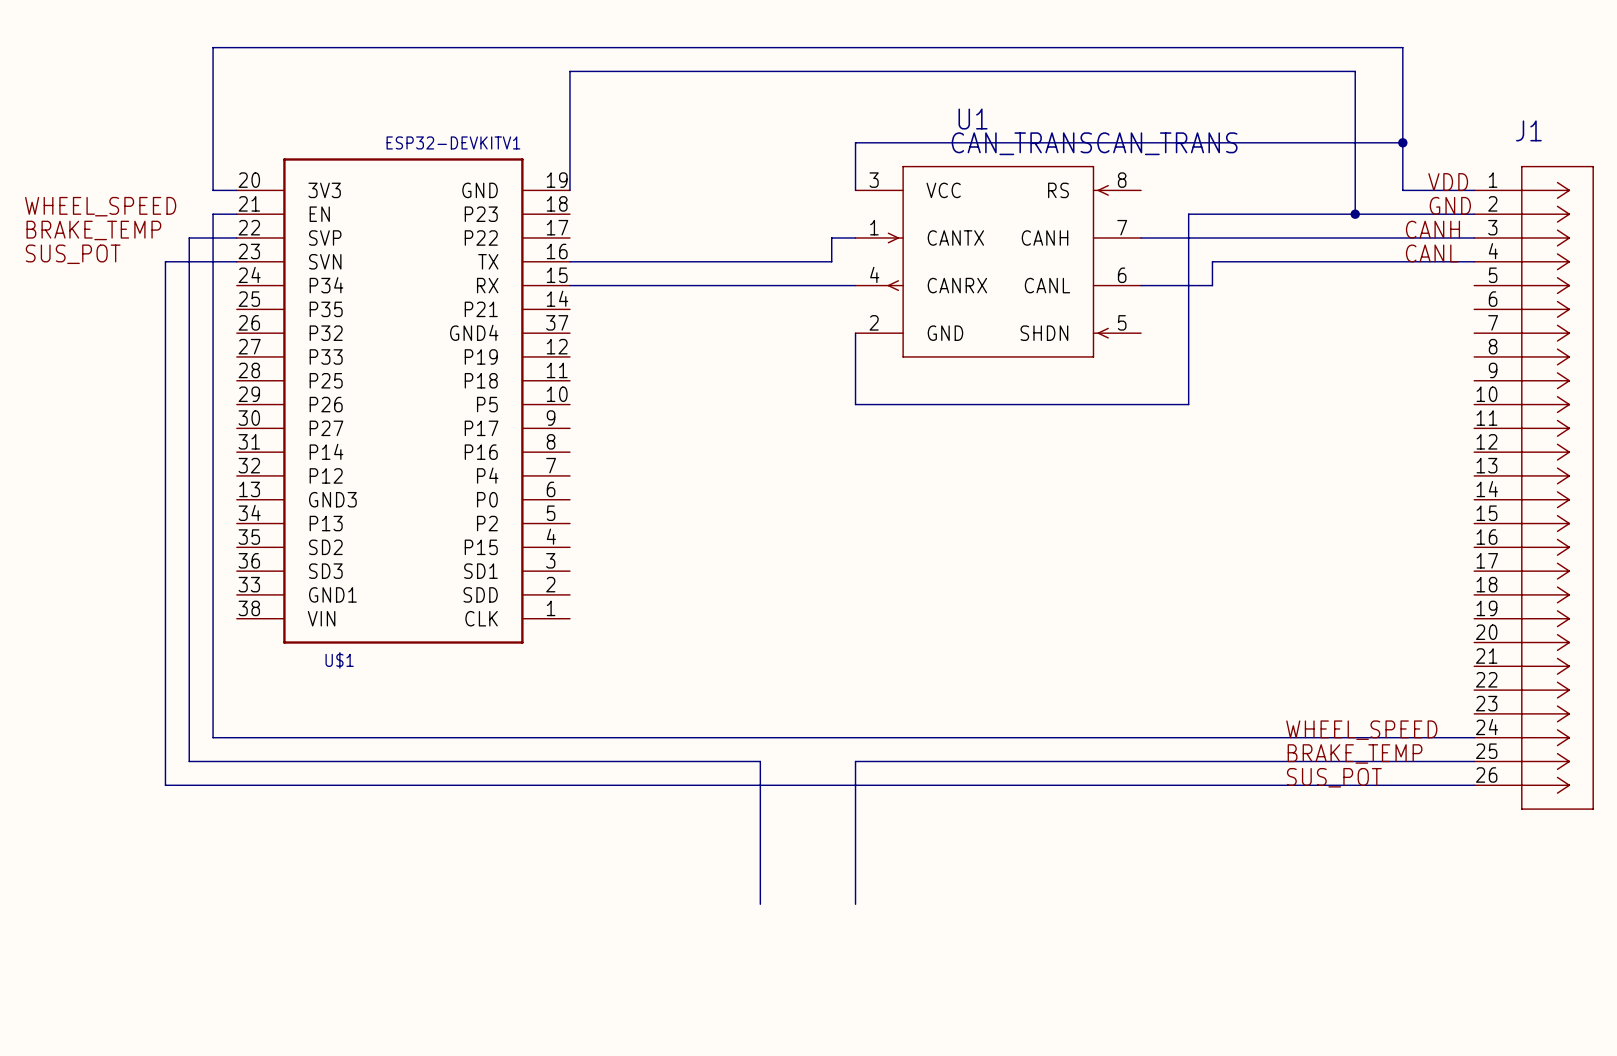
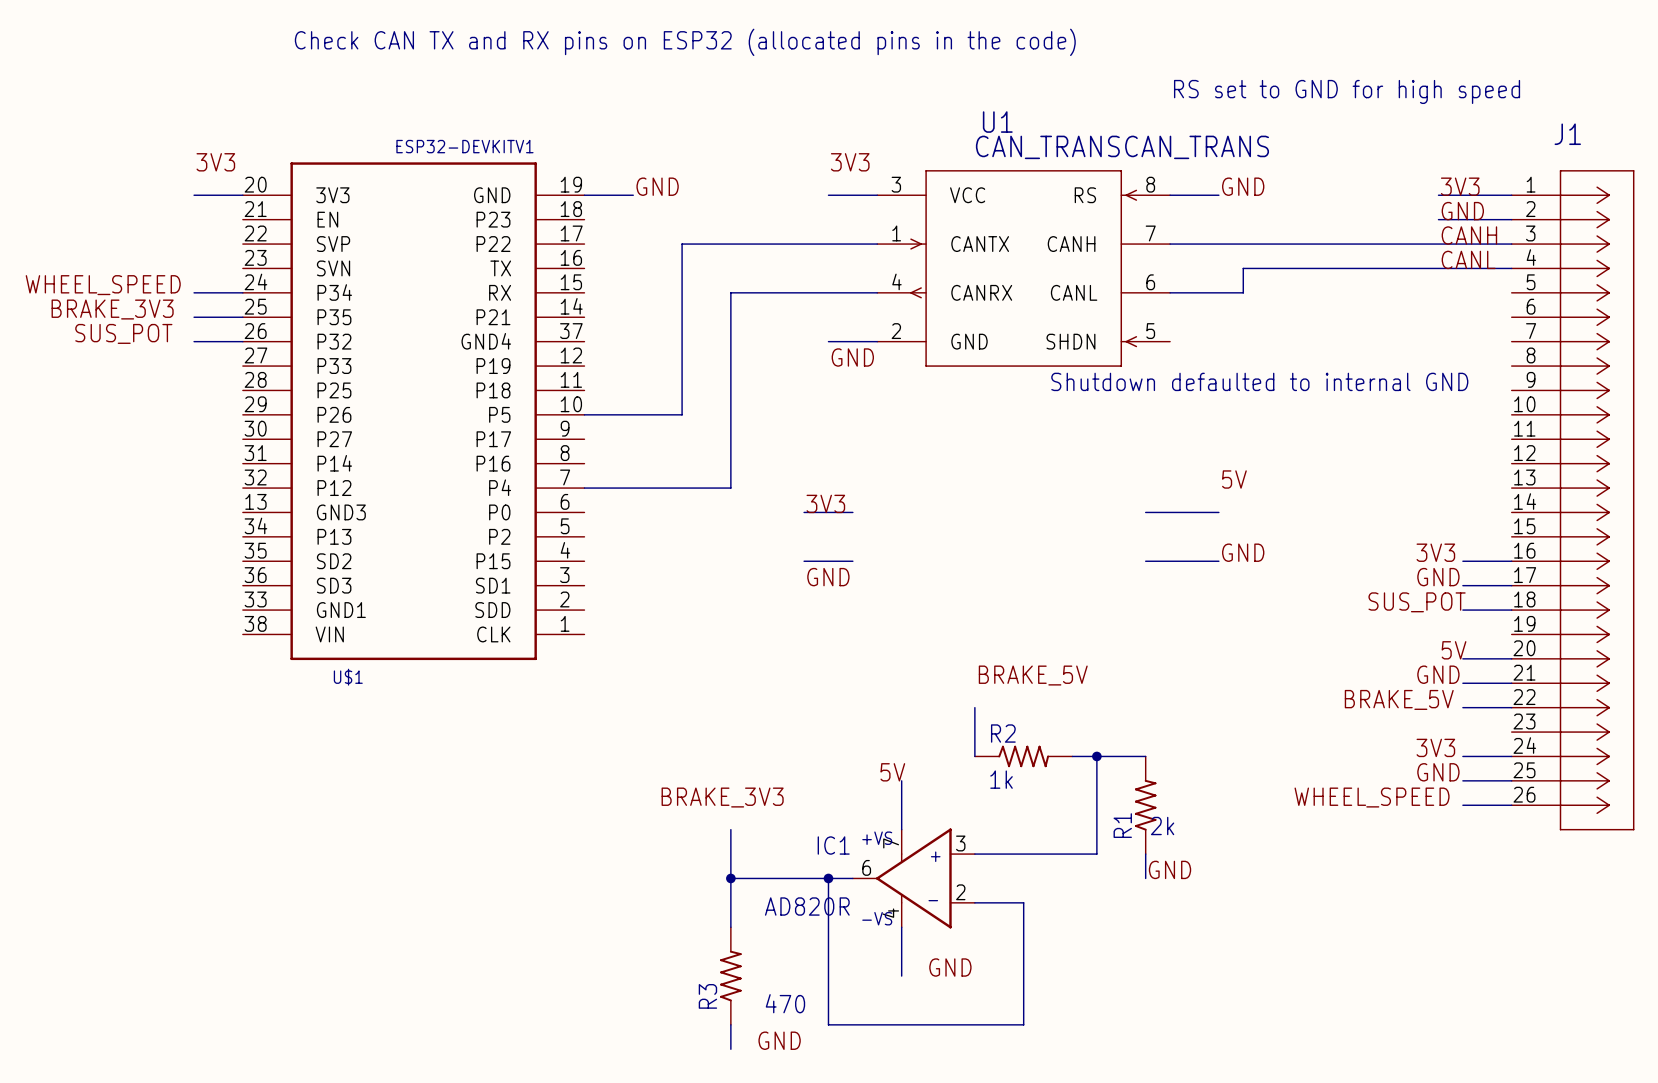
text: none -> Check CAN TX and RX pins on ESP32 (allocated pins in the code) (685, 42)
text: none -> RS set to GND for high speed (1347, 91)
wire: (1402, 142) (855, 142) (855, 190) -> (828, 195) (877, 195)
junction: (1402, 142) -> none
label: none -> 3V3 (215, 162)
label: none -> 3V3 (850, 162)
label: none -> GND (657, 186)
label: none -> GND (1243, 186)
label: none -> 3V3 (1460, 186)
label: VDD (1448, 182) -> none
wire: (213, 190) (213, 47) (1402, 47) (1402, 190) -> (218, 195) (194, 195)
wire: (569, 190) (569, 71) (1355, 71) (1355, 214) -> (584, 195) (633, 195)
wire: none -> (1170, 195) (1218, 195)
label position: GND (1450, 205) -> GND (1462, 211)
label position: WHEEL_SPEED (100, 206) -> WHEEL_SPEED (103, 285)
wire: (236, 214) (213, 214) (213, 737) (1045, 737) -> none
junction: (1355, 214) -> none
wire: (1402, 214) (1188, 214) (1188, 404) (855, 404) (855, 333) -> (828, 341) (877, 341)
label: BRAKE_TEMP (93, 230) -> none
wire: (236, 237) (189, 237) (189, 761) (760, 761) (760, 904) -> none
wire: (831, 237) (831, 261) (569, 261) -> (852, 244) (682, 244) (682, 414) (584, 414)
label position: SUS_POT (73, 254) -> SUS_POT (123, 333)
wire: (236, 261) (165, 261) (165, 785) (1426, 785) -> none
wire: none -> (194, 292) (242, 292)
wire: (569, 285) (712, 285) -> (584, 488) (730, 488) (730, 292)
label: none -> BRAKE_3V3 (112, 309)
wire: none -> (194, 317) (242, 317)
wire: none -> (194, 341) (242, 341)
label: none -> GND (852, 357)
text: none -> Shutdown defaulted to internal GND (1259, 381)
label: none -> 5V (1234, 479)
label: none -> 3V3 (825, 503)
wire: none -> (804, 512) (852, 512)
wire: none -> (1145, 512) (1218, 512)
label: none -> GND (1243, 552)
label: none -> 3V3 (1435, 552)
wire: none -> (804, 561) (852, 561)
wire: none -> (1145, 561) (1218, 561)
wire: none -> (1462, 561) (1511, 561)
label: none -> GND (828, 577)
label: none -> GND (1438, 577)
wire: none -> (1462, 585) (1511, 585)
wire: none -> (1462, 610) (1511, 610)
label: none -> 5V (1454, 650)
wire: none -> (1462, 658) (1511, 658)
label: none -> GND (1438, 674)
label: none -> BRAKE_5V (1033, 675)
wire: none -> (1462, 683) (1511, 683)
label: none -> BRAKE_5V (1399, 699)
wire: none -> (974, 707) (974, 756)
wire: none -> (1462, 707) (1511, 707)
label: none -> 3V3 (1435, 747)
label position: WHEEL_SPEED (1361, 730) -> WHEEL_SPEED (1372, 797)
R2: none -> 1k (1023, 756)
wire: none -> (1096, 756) (1096, 854) (974, 854)
junction: none -> (1096, 756)
wire: (1117, 737) (1426, 737) -> none
label: none -> 5V (892, 772)
label: BRAKE_TEMP (1355, 753) -> none
label: none -> GND (1438, 772)
wire: none -> (901, 780) (901, 829)
wire: (1426, 761) (855, 761) (855, 904) -> none
label: none -> BRAKE_3V3 (722, 797)
label position: SUS_POT (1334, 777) -> SUS_POT (1417, 602)
R1: none -> 2k (1145, 805)
wire: none -> (730, 829) (730, 927)
wire: none -> (1145, 854) (1145, 878)
label: none -> GND (1170, 869)
wire: none -> (730, 878) (852, 878)
junction: none -> (730, 878)
wire: none -> (828, 878) (828, 1024) (1023, 1024) (1023, 902) (974, 902)
junction: none -> (828, 878)
IC1: none -> AD820R (913, 878)
wire: none -> (901, 927) (901, 976)
label: none -> GND (950, 967)
R3: none -> 470 (730, 976)
wire: none -> (730, 1024) (730, 1049)
label: none -> GND (779, 1040)

